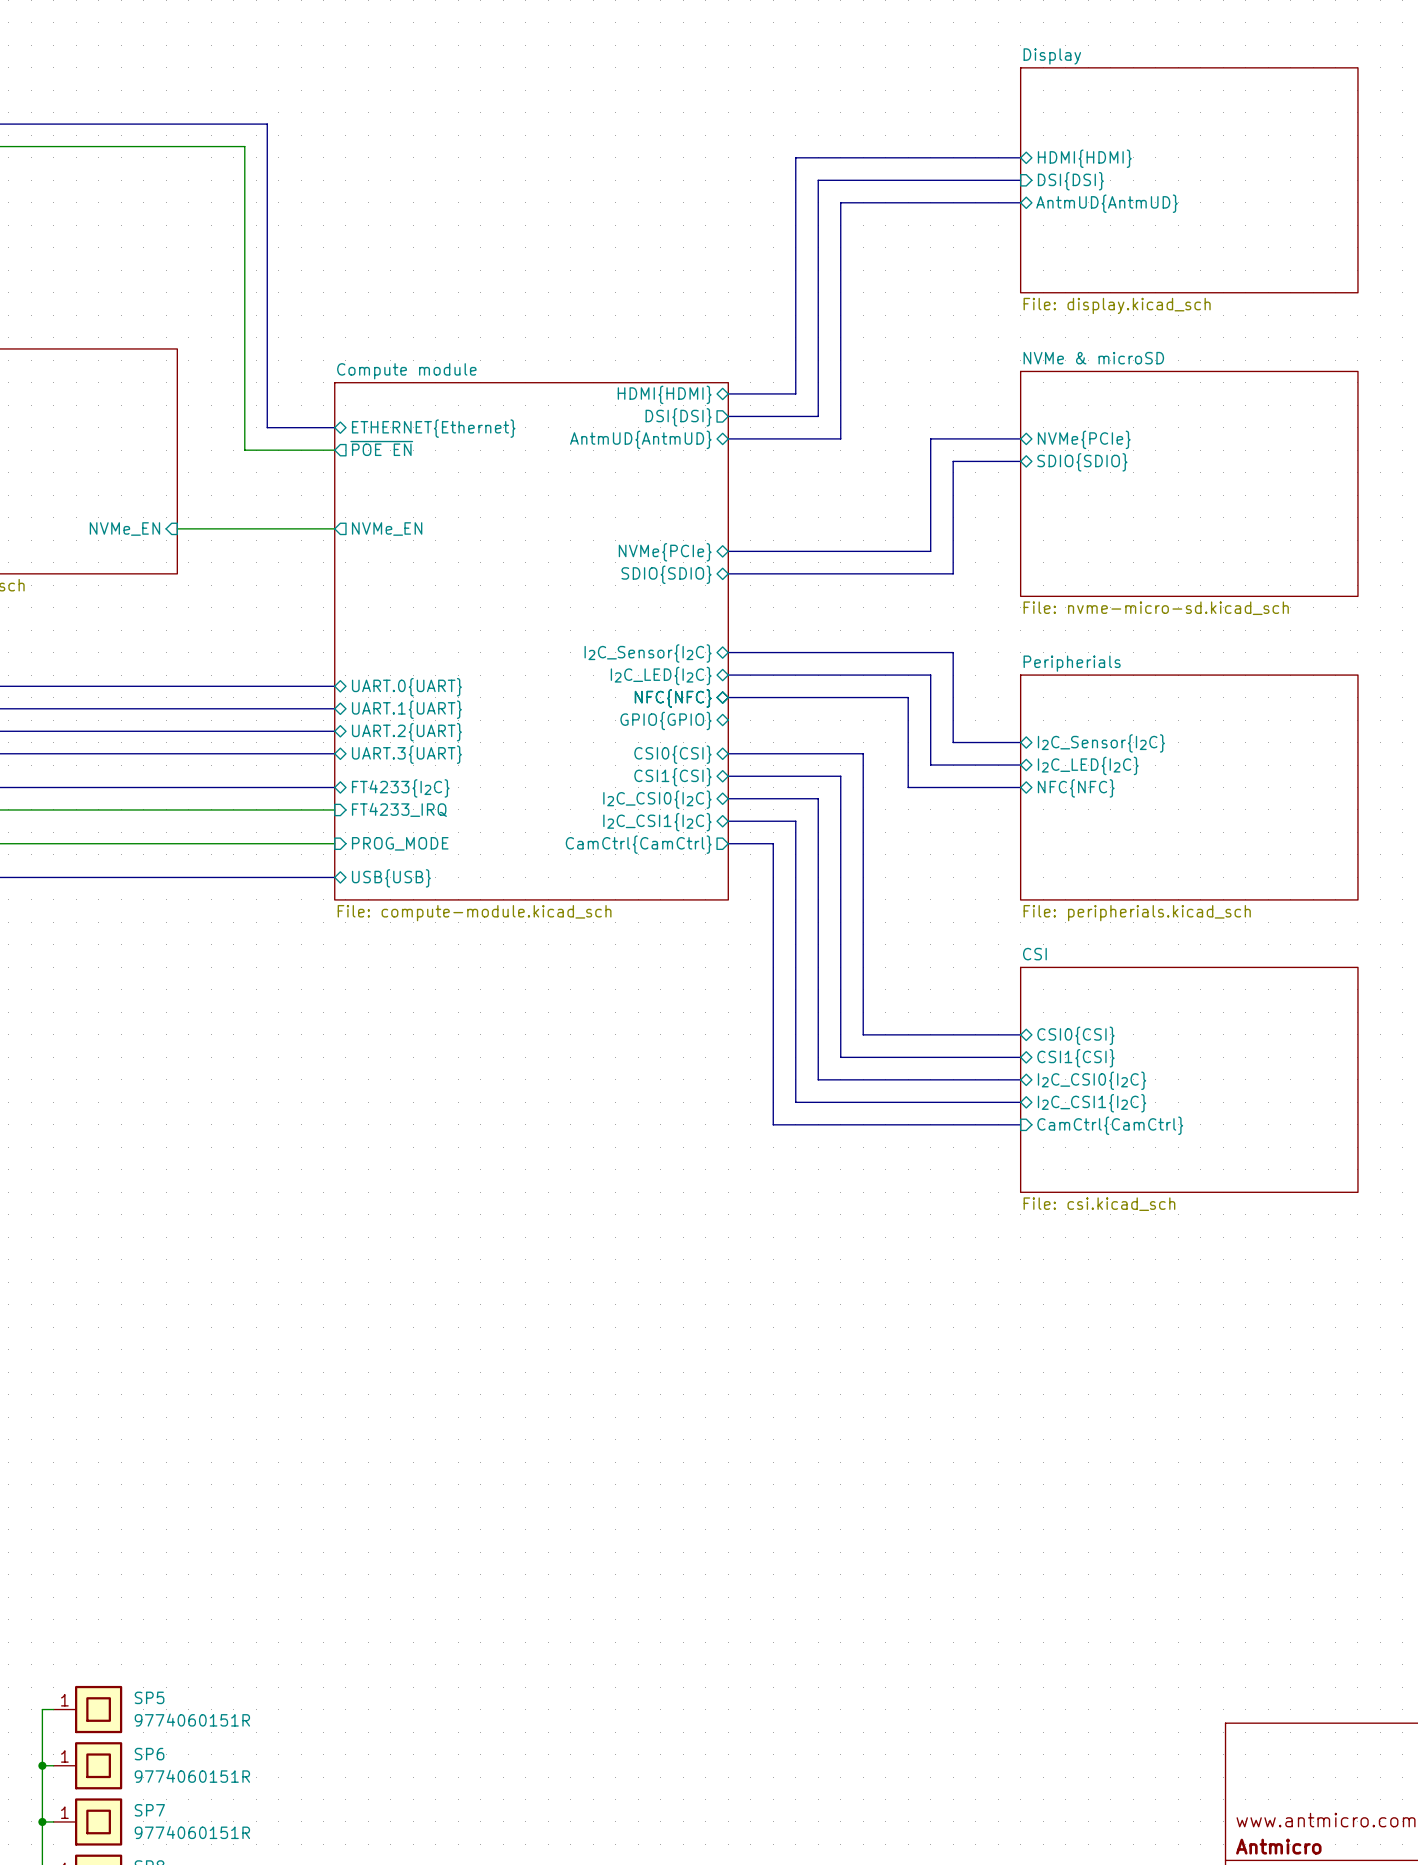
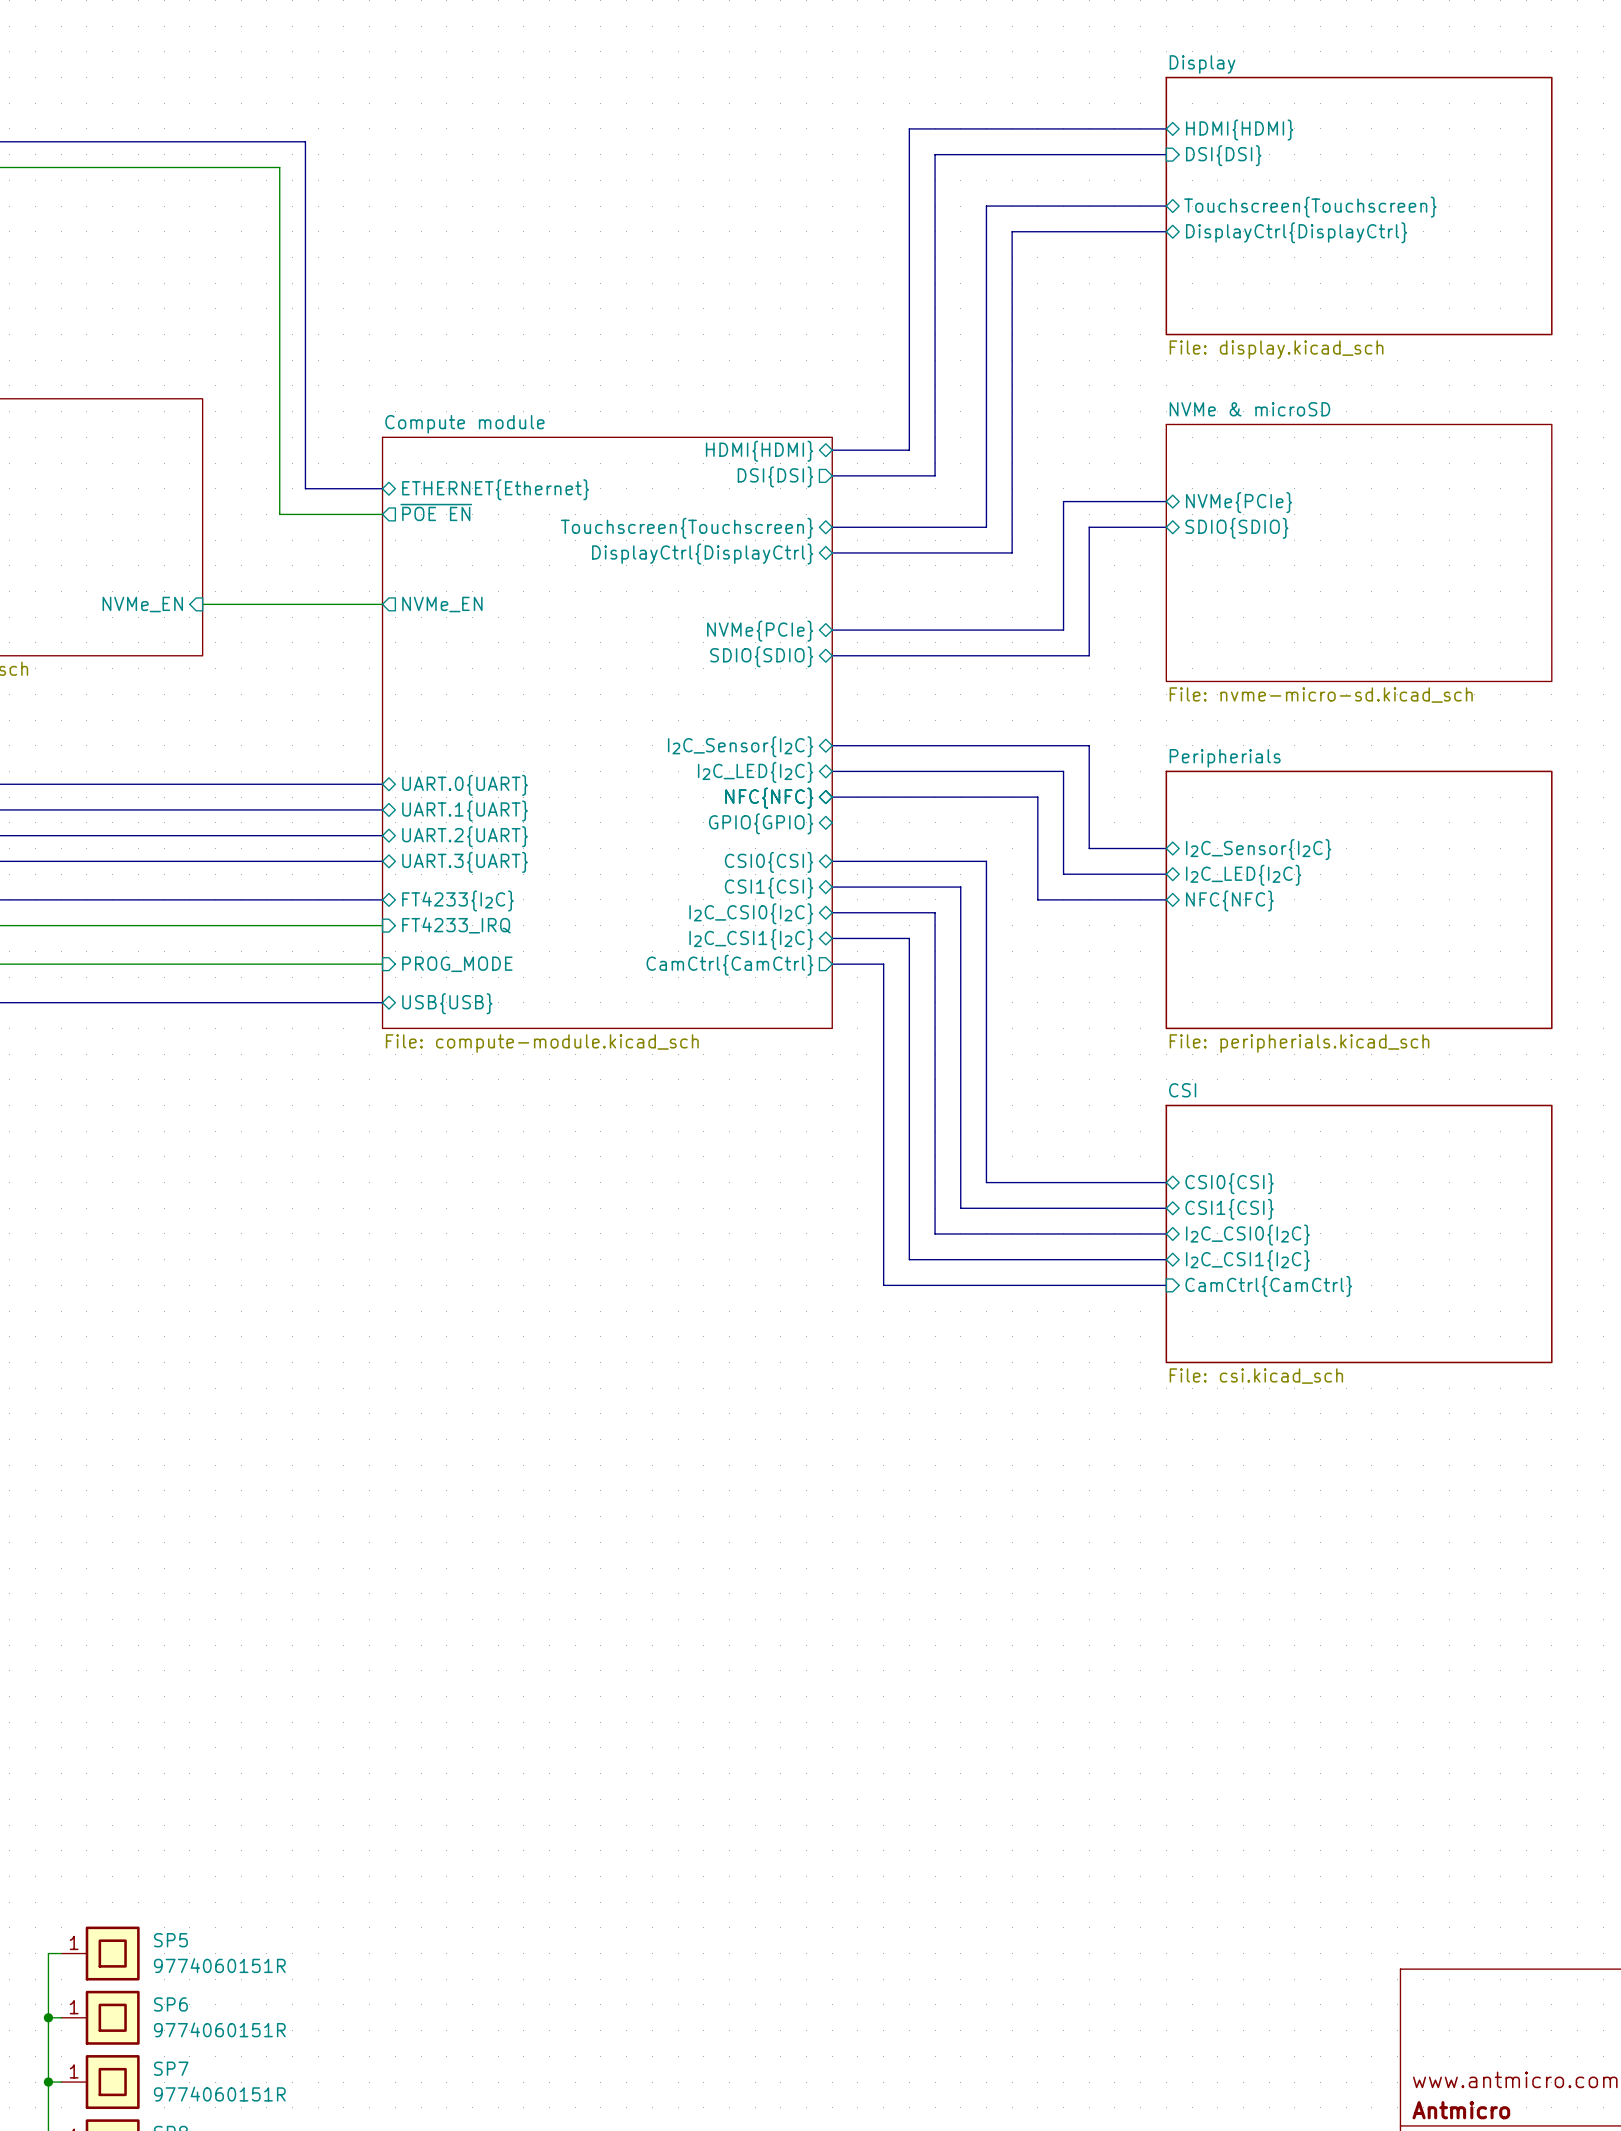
sheet pin: none -> DSI{DSI} (1223, 155)
bus: (795, 157) (1020, 157) -> (909, 180) (909, 128) (1166, 128)
sheet pin position: HDMI{HDMI} (1084, 158) -> HDMI{HDMI} (1239, 129)
bus: (818, 180) (863, 180) -> (935, 206) (935, 154) (1166, 154)
bus: none -> (986, 206) (986, 527) (832, 527)
sheet pin shape: input (1070, 181) -> bidirectional (1310, 207)
sheet pin: DSI{DSI} (1070, 181) -> Touchscreen{Touchscreen} (1310, 207)
bus: (885, 202) (840, 202) (840, 438) (728, 438) -> (1012, 231) (1012, 552) (832, 552)
sheet pin: AntmUD{AntmUD} (1107, 203) -> DisplayCtrl{DisplayCtrl} (1296, 232)
sheet pin: AntmUD{AntmUD} (640, 439) -> none
sheet pin: none -> Touchscreen{Touchscreen} (687, 528)
sheet pin: none -> DisplayCtrl{DisplayCtrl} (702, 554)

